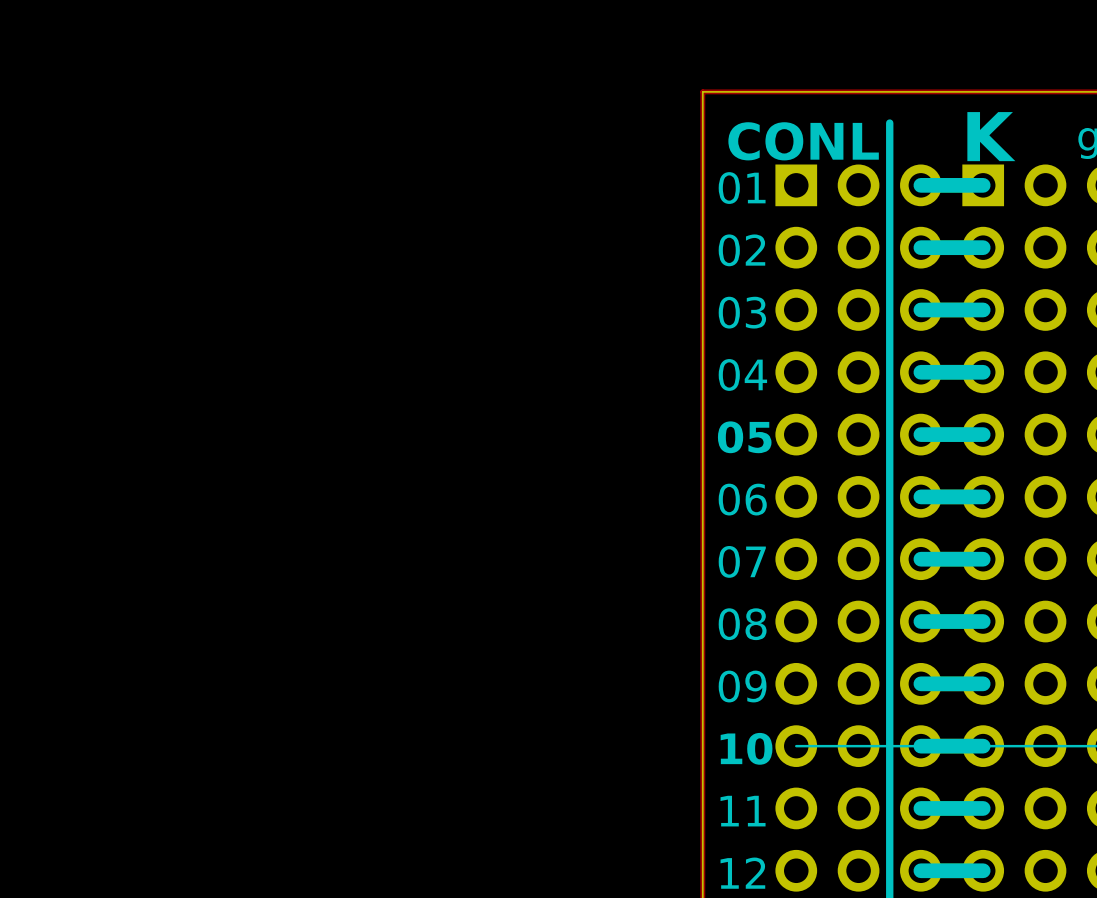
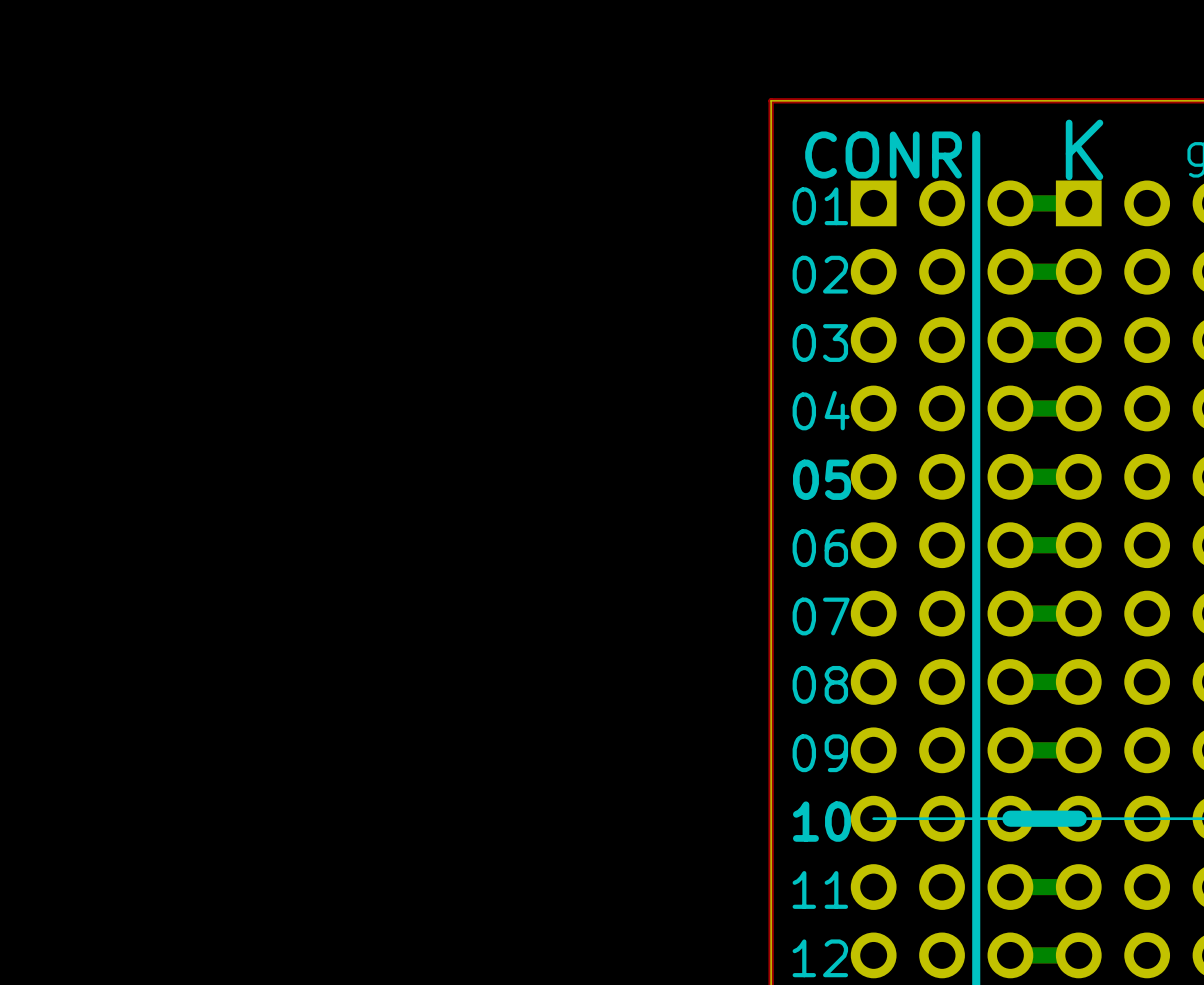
text: CONL (803, 141) -> CONR (883, 155)
line: (983, 185) (920, 185) -> none
line: (983, 247) (920, 247) -> none
line: (983, 309) (920, 309) -> none
line: (983, 372) (920, 372) -> none
line: (983, 434) (920, 434) -> none
line: (983, 496) (920, 496) -> none
line: (983, 559) (920, 559) -> none
line: (983, 621) (920, 621) -> none
line: (983, 683) (920, 683) -> none
line: (983, 808) (920, 808) -> none
line: (983, 870) (920, 870) -> none

